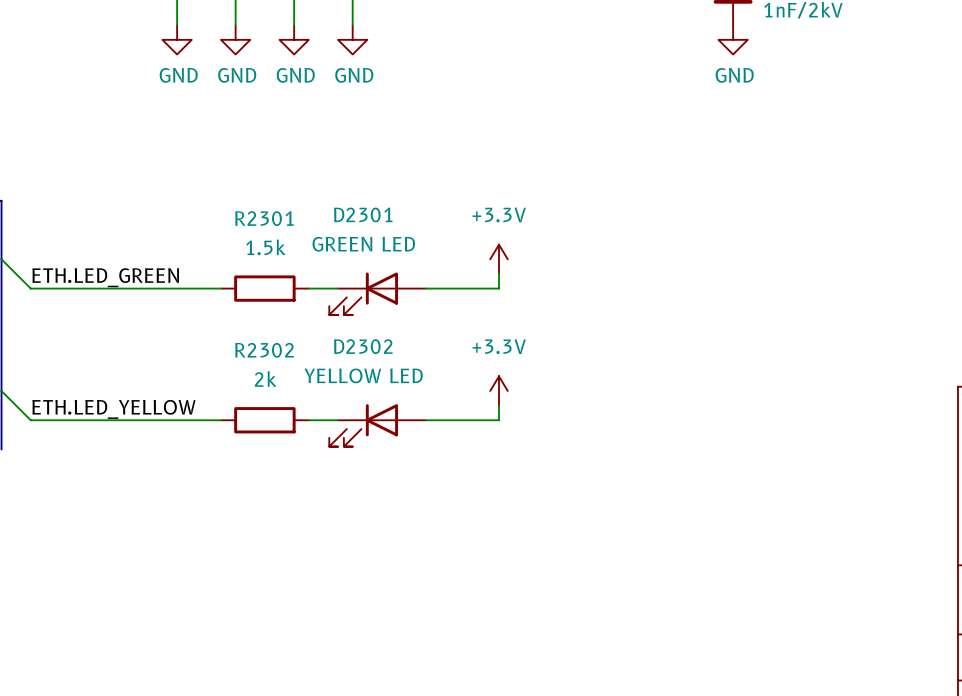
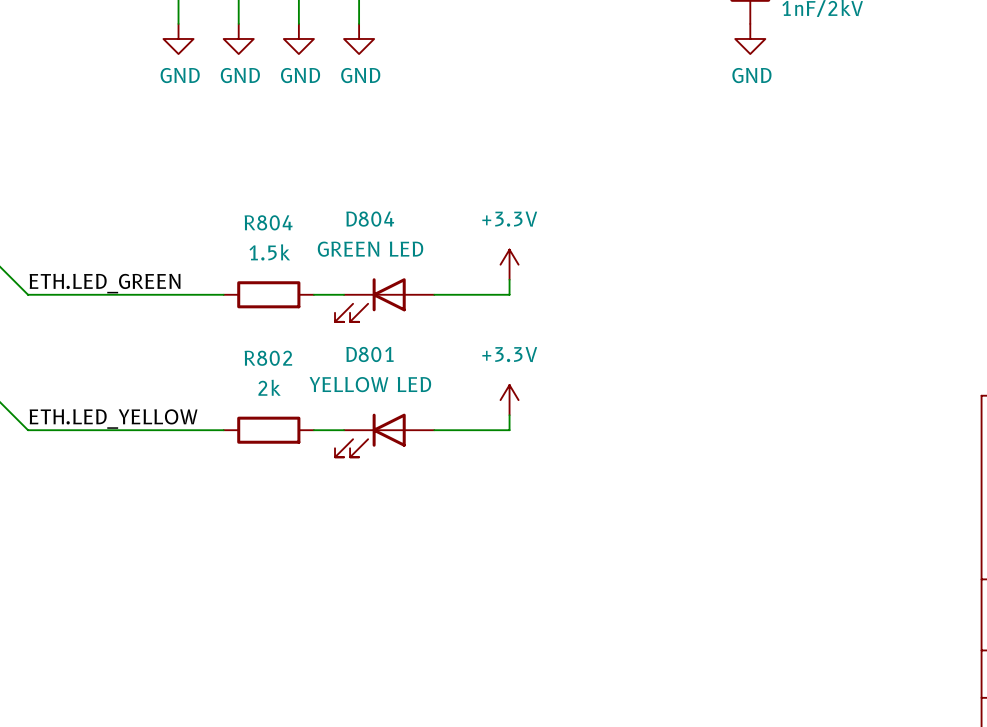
D2301 name: D2301 (363, 214) -> D804 (370, 219)
R2301 name: R2301 (264, 218) -> R804 (268, 222)
D2302 name: D2302 (363, 346) -> D801 (369, 354)
R2302 name: R2302 (264, 350) -> R802 (268, 358)

